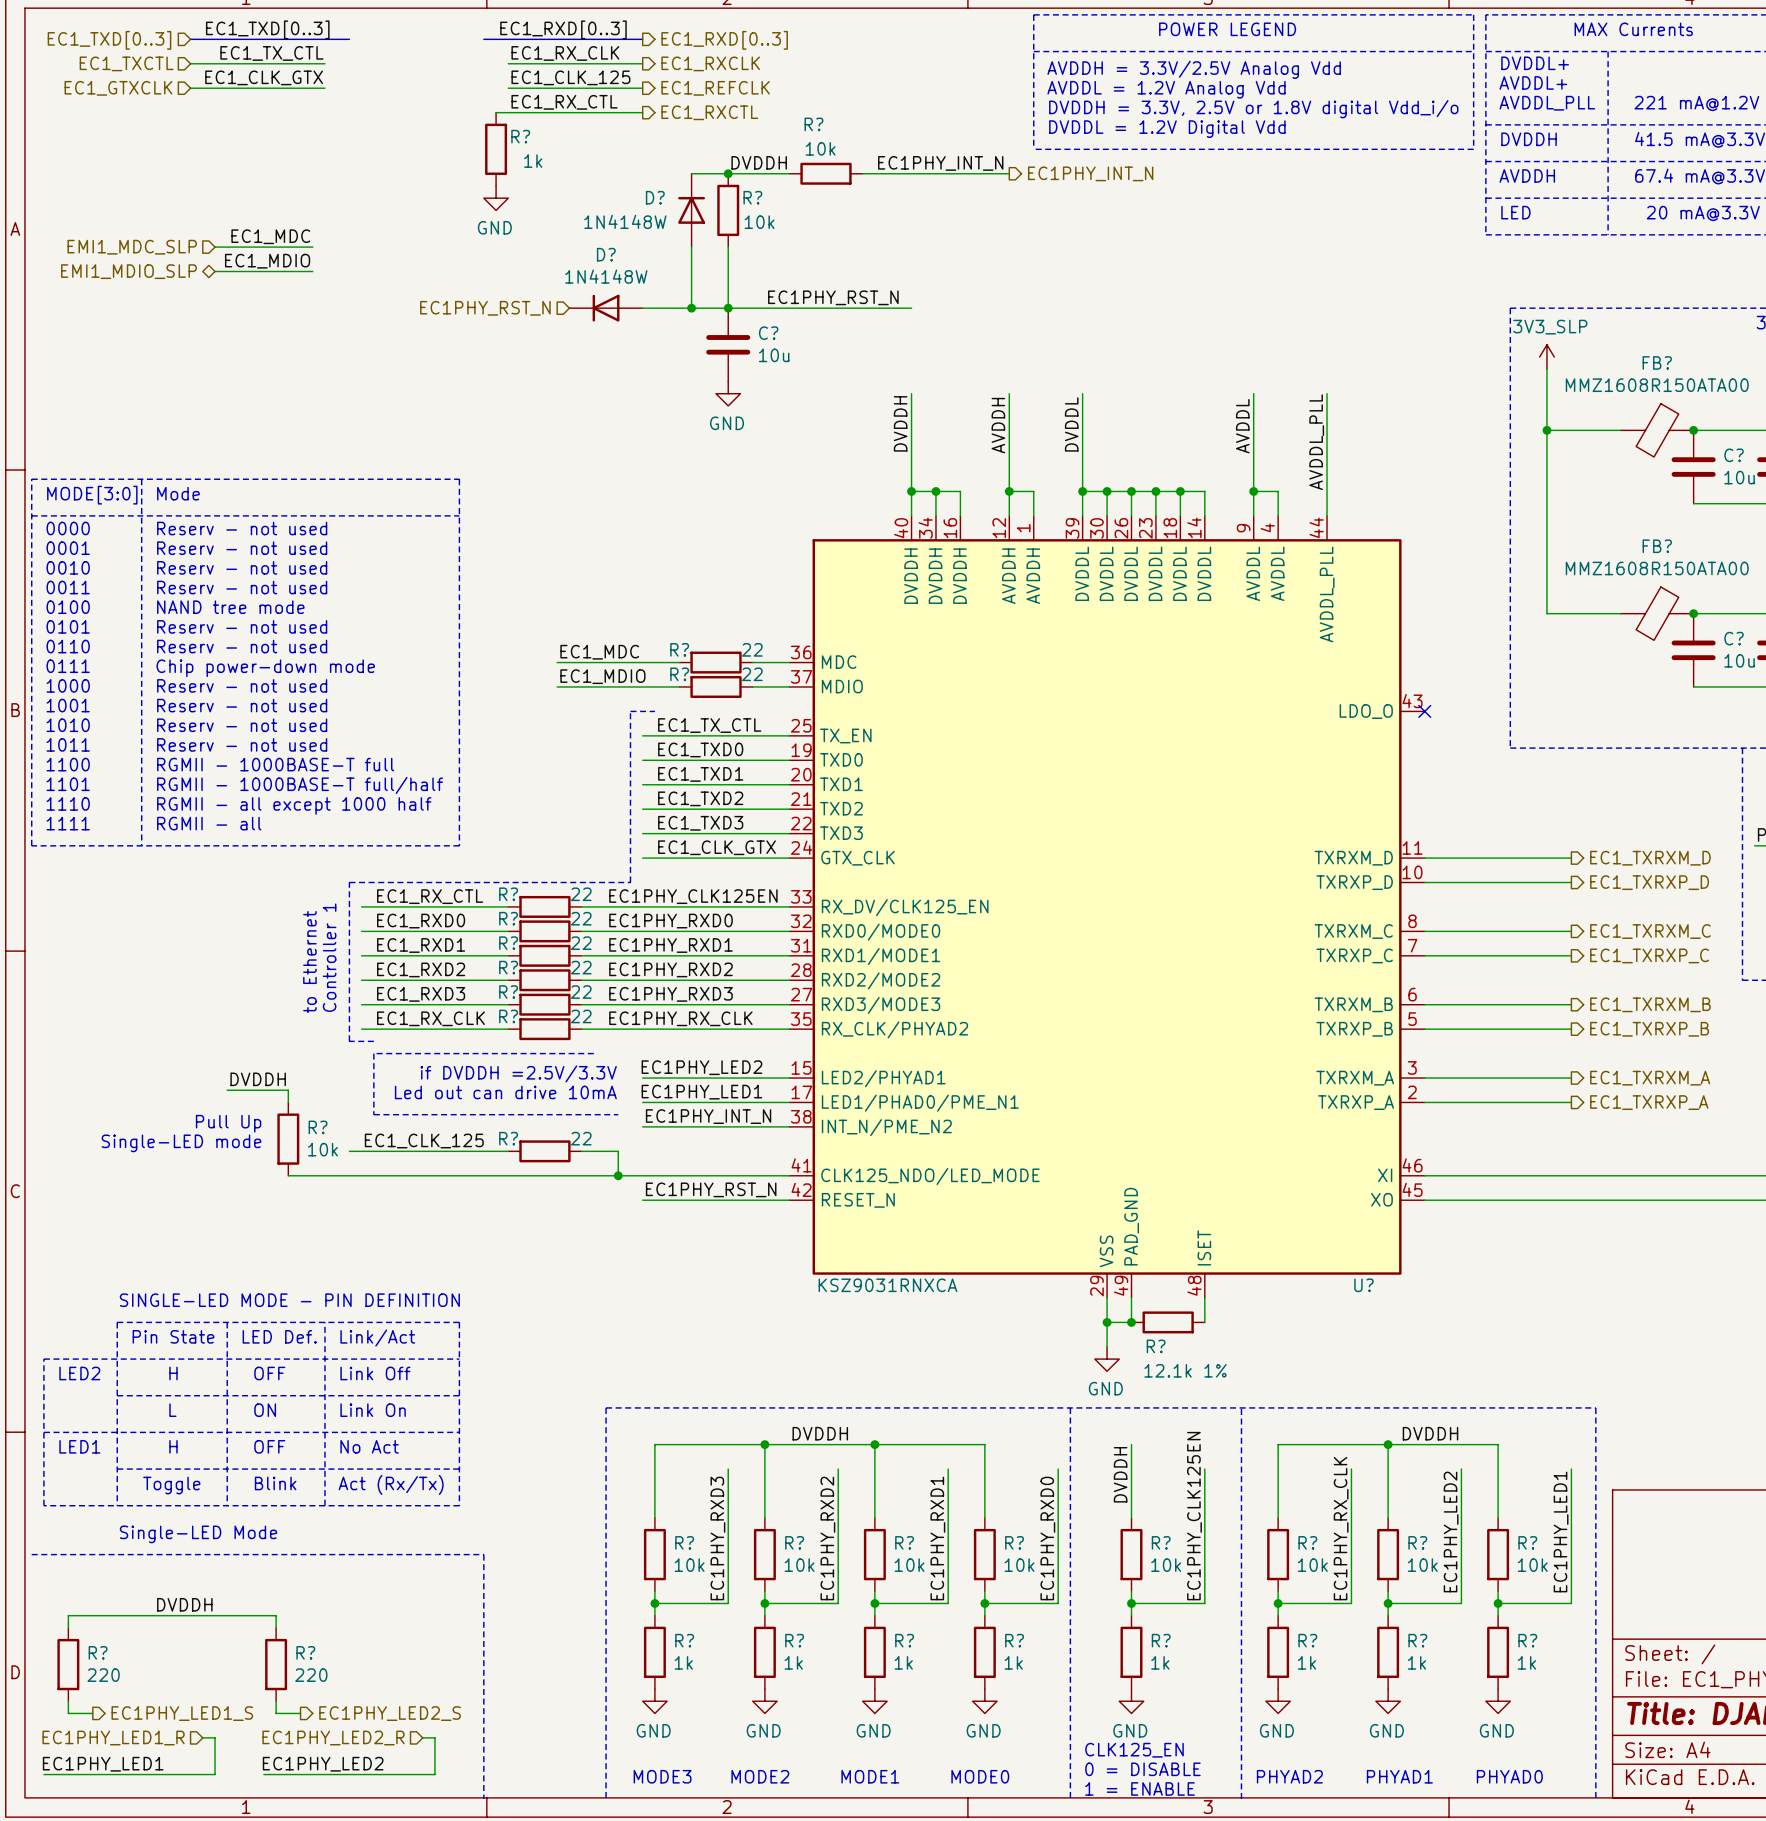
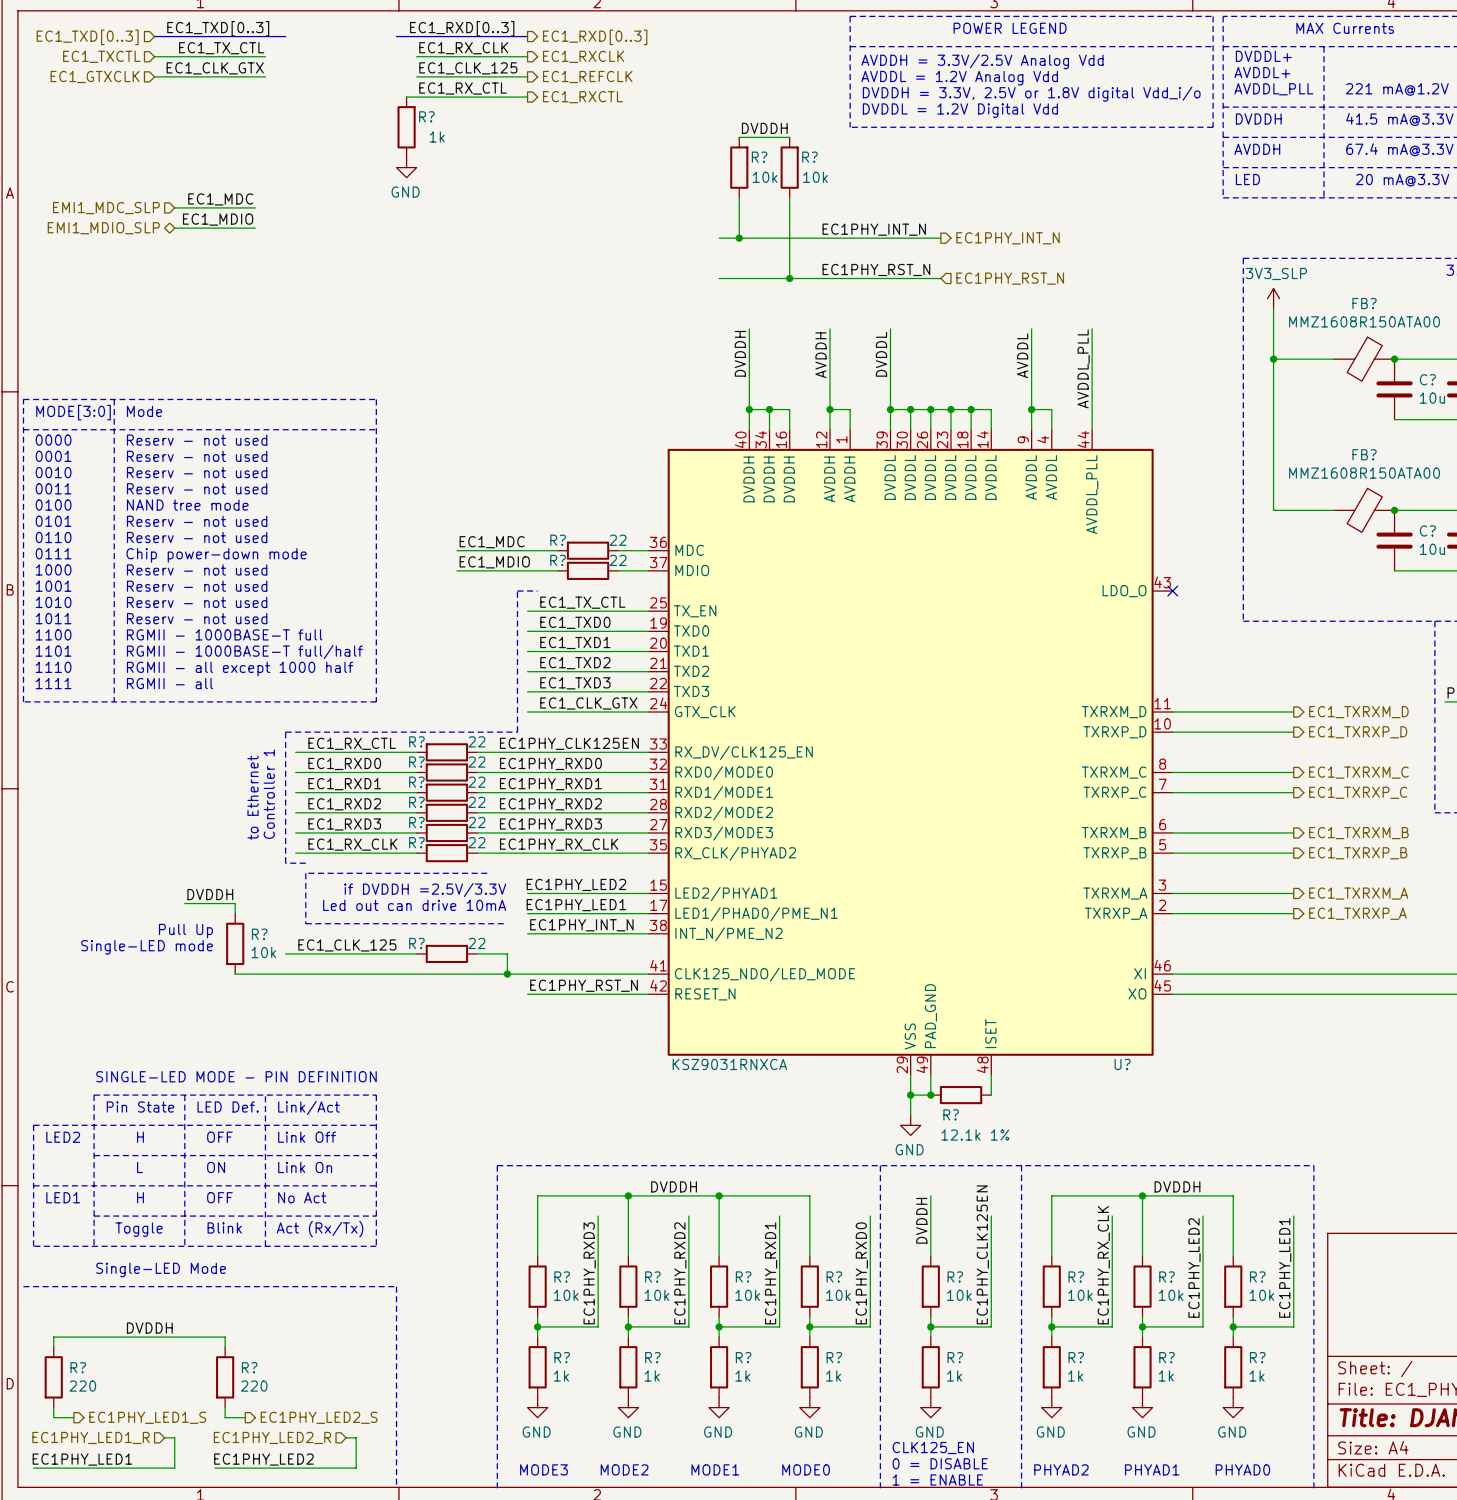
wire: none -> (739, 137) (789, 137)
label position: DVDDH (759, 162) -> DVDDH (764, 128)
label position: EC1PHY_INT_N (940, 163) -> EC1PHY_INT_N (874, 229)
wire: (691, 173) (789, 173) -> none
junction: (728, 173) -> none
R?: 10k (826, 173) -> none
wire: (862, 173) (1009, 173) -> none
hierarchical label position: EC1PHY_INT_N (1090, 173) -> EC1PHY_INT_N (1008, 238)
R?: none -> 10k (739, 167)
R?: none -> 10k (789, 167)
D?: 1N4148W (691, 210) -> none
R?: 10k (728, 210) -> none
wire: none -> (739, 197) (739, 238)
wire: none -> (789, 197) (789, 278)
wire: (691, 247) (691, 308) -> none
wire: (728, 247) (728, 308) -> none
junction: none -> (739, 238)
label position: EC1PHY_RST_N (833, 297) -> EC1PHY_RST_N (876, 269)
hierarchical label: EC1PHY_RST_N (485, 308) -> none
D?: 1N4148W (606, 308) -> none
wire: (642, 308) (911, 308) -> (719, 238) (940, 238)
junction: (691, 308) -> none
junction: (728, 308) -> none
wire: none -> (719, 278) (940, 278)
junction: none -> (789, 278)
hierarchical label: none -> EC1PHY_RST_N (1010, 278)
C?: 10u (728, 344) -> none
power symbol: GND (728, 393) -> none

